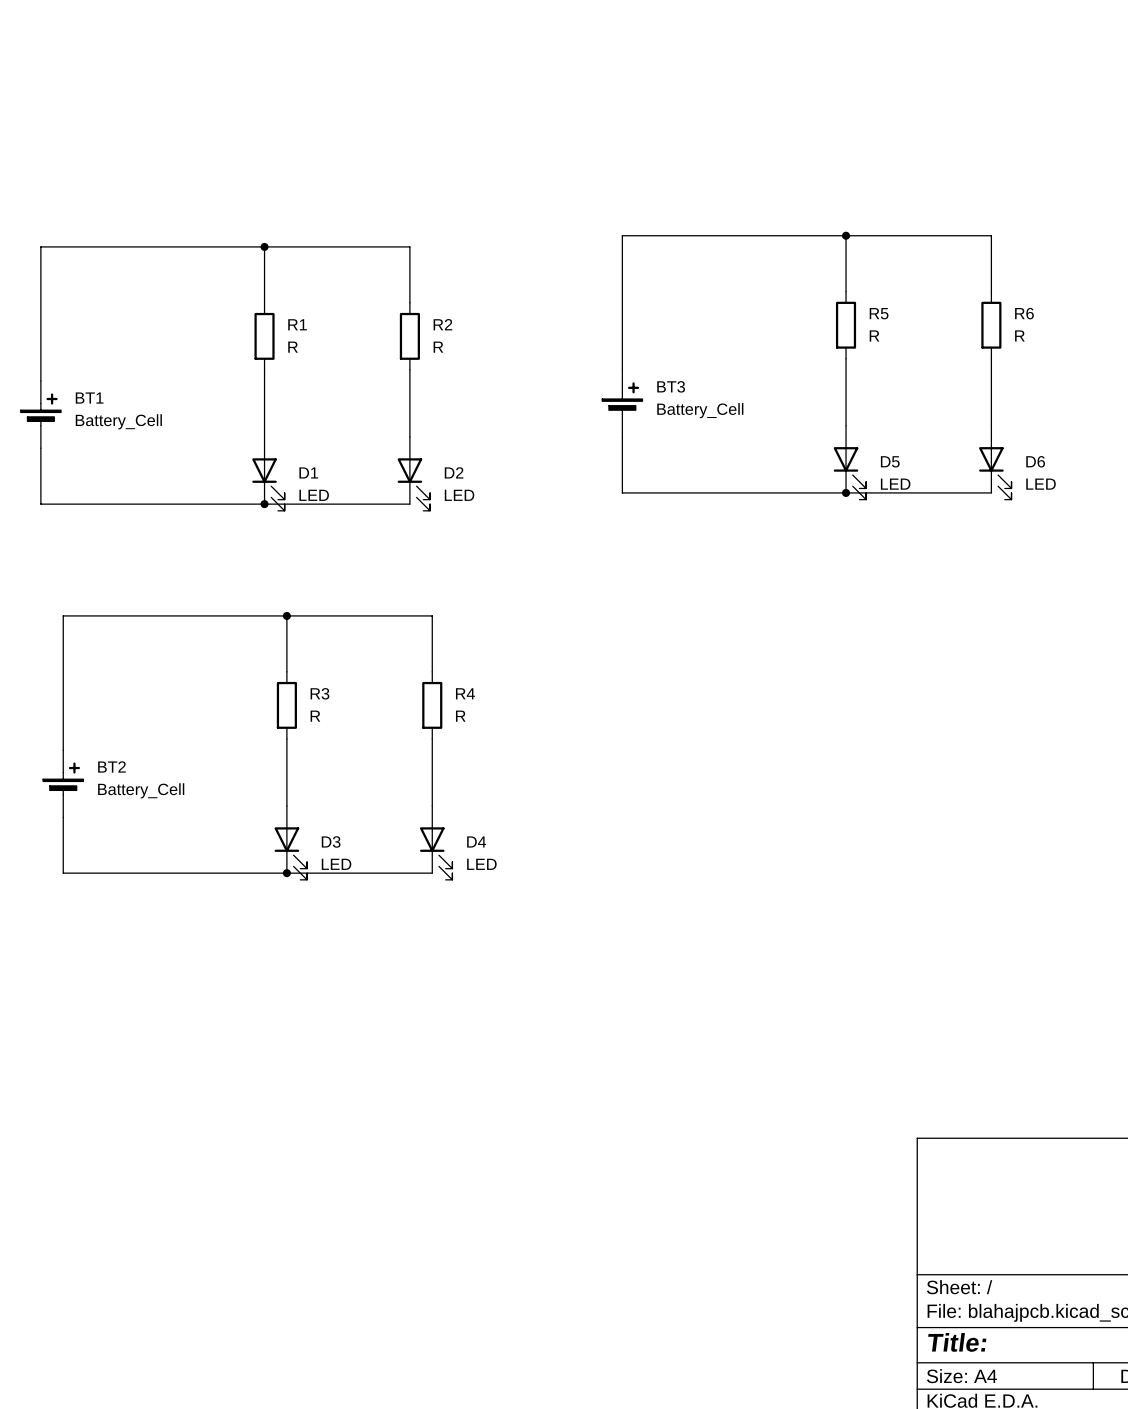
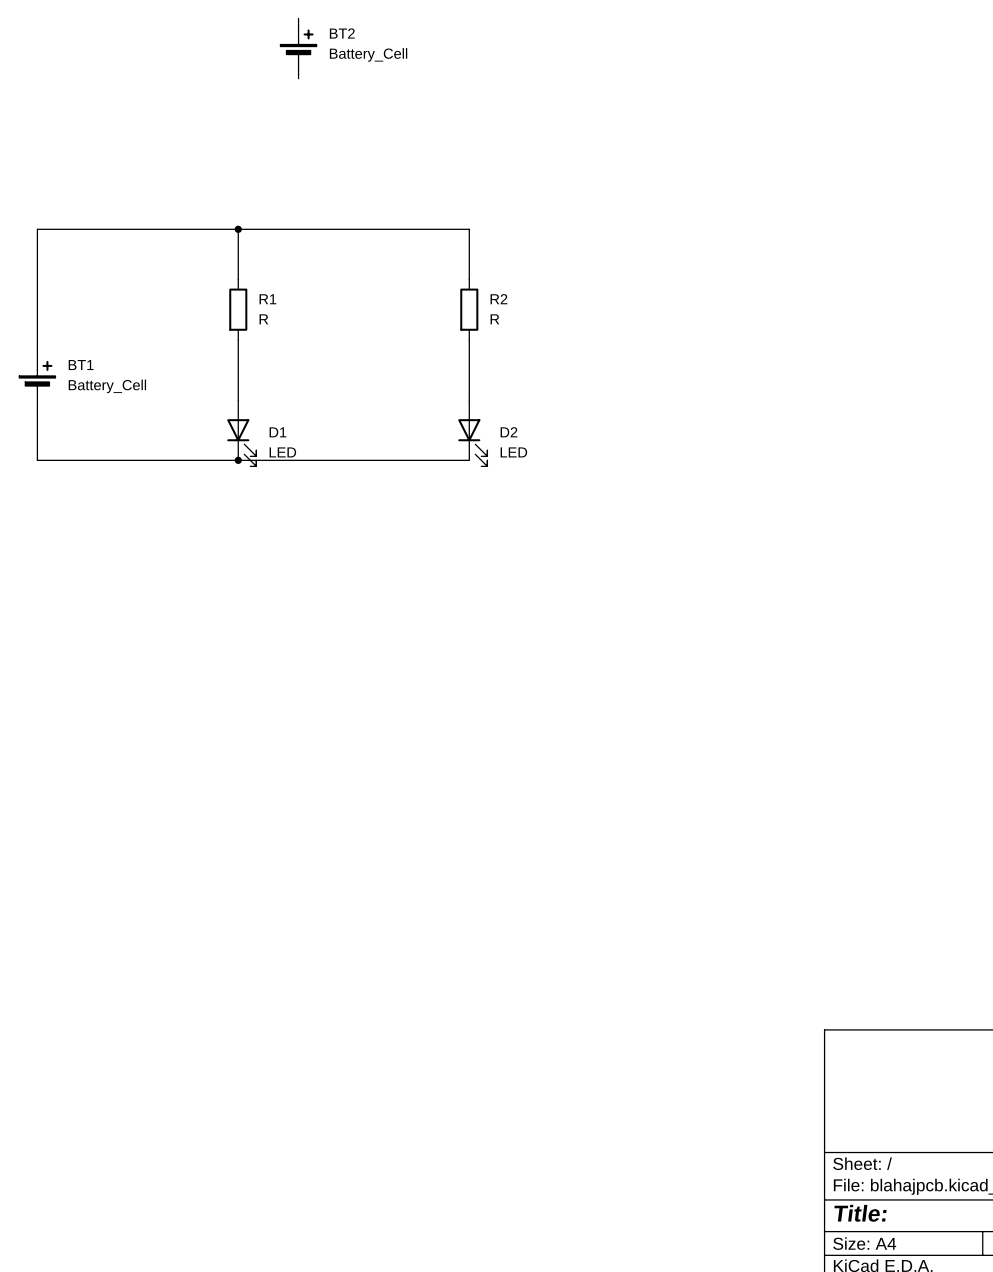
wire: (846, 235) (846, 291) -> none
junction: (846, 235) -> none
wire: (409, 246) (409, 302) -> (368, 229) (469, 229) (469, 279)
wire: (991, 291) (991, 235) (622, 235) (622, 369) -> none
R5: R (846, 325) -> none
R6: R (991, 325) -> none
R2 position: (409, 336) -> (469, 309)
wire: (846, 358) (846, 425) -> none
wire: (991, 358) (991, 425) -> none
wire: (409, 369) (409, 437) -> (469, 339) (469, 400)
BT3: Battery_Cell (622, 403) -> none
wire: (622, 437) (622, 492) (991, 492) -> none
D5: LED (849, 462) -> none
D6: LED (995, 462) -> none
D2 position: (413, 473) -> (472, 433)
junction: (846, 492) -> none
wire: none -> (368, 460) (469, 460)
wire: (286, 615) (286, 671) -> none
junction: (286, 615) -> none
wire: (432, 671) (432, 615) (63, 615) (63, 750) -> none
R3: R (286, 705) -> none
R4: R (432, 705) -> none
wire: (286, 738) (286, 806) -> none
wire: (432, 738) (432, 806) -> none
BT2 position: (63, 783) -> (298, 48)
wire: (63, 817) (63, 873) (432, 873) -> none
D3: LED (290, 842) -> none
D4: LED (436, 842) -> none
junction: (286, 873) -> none

